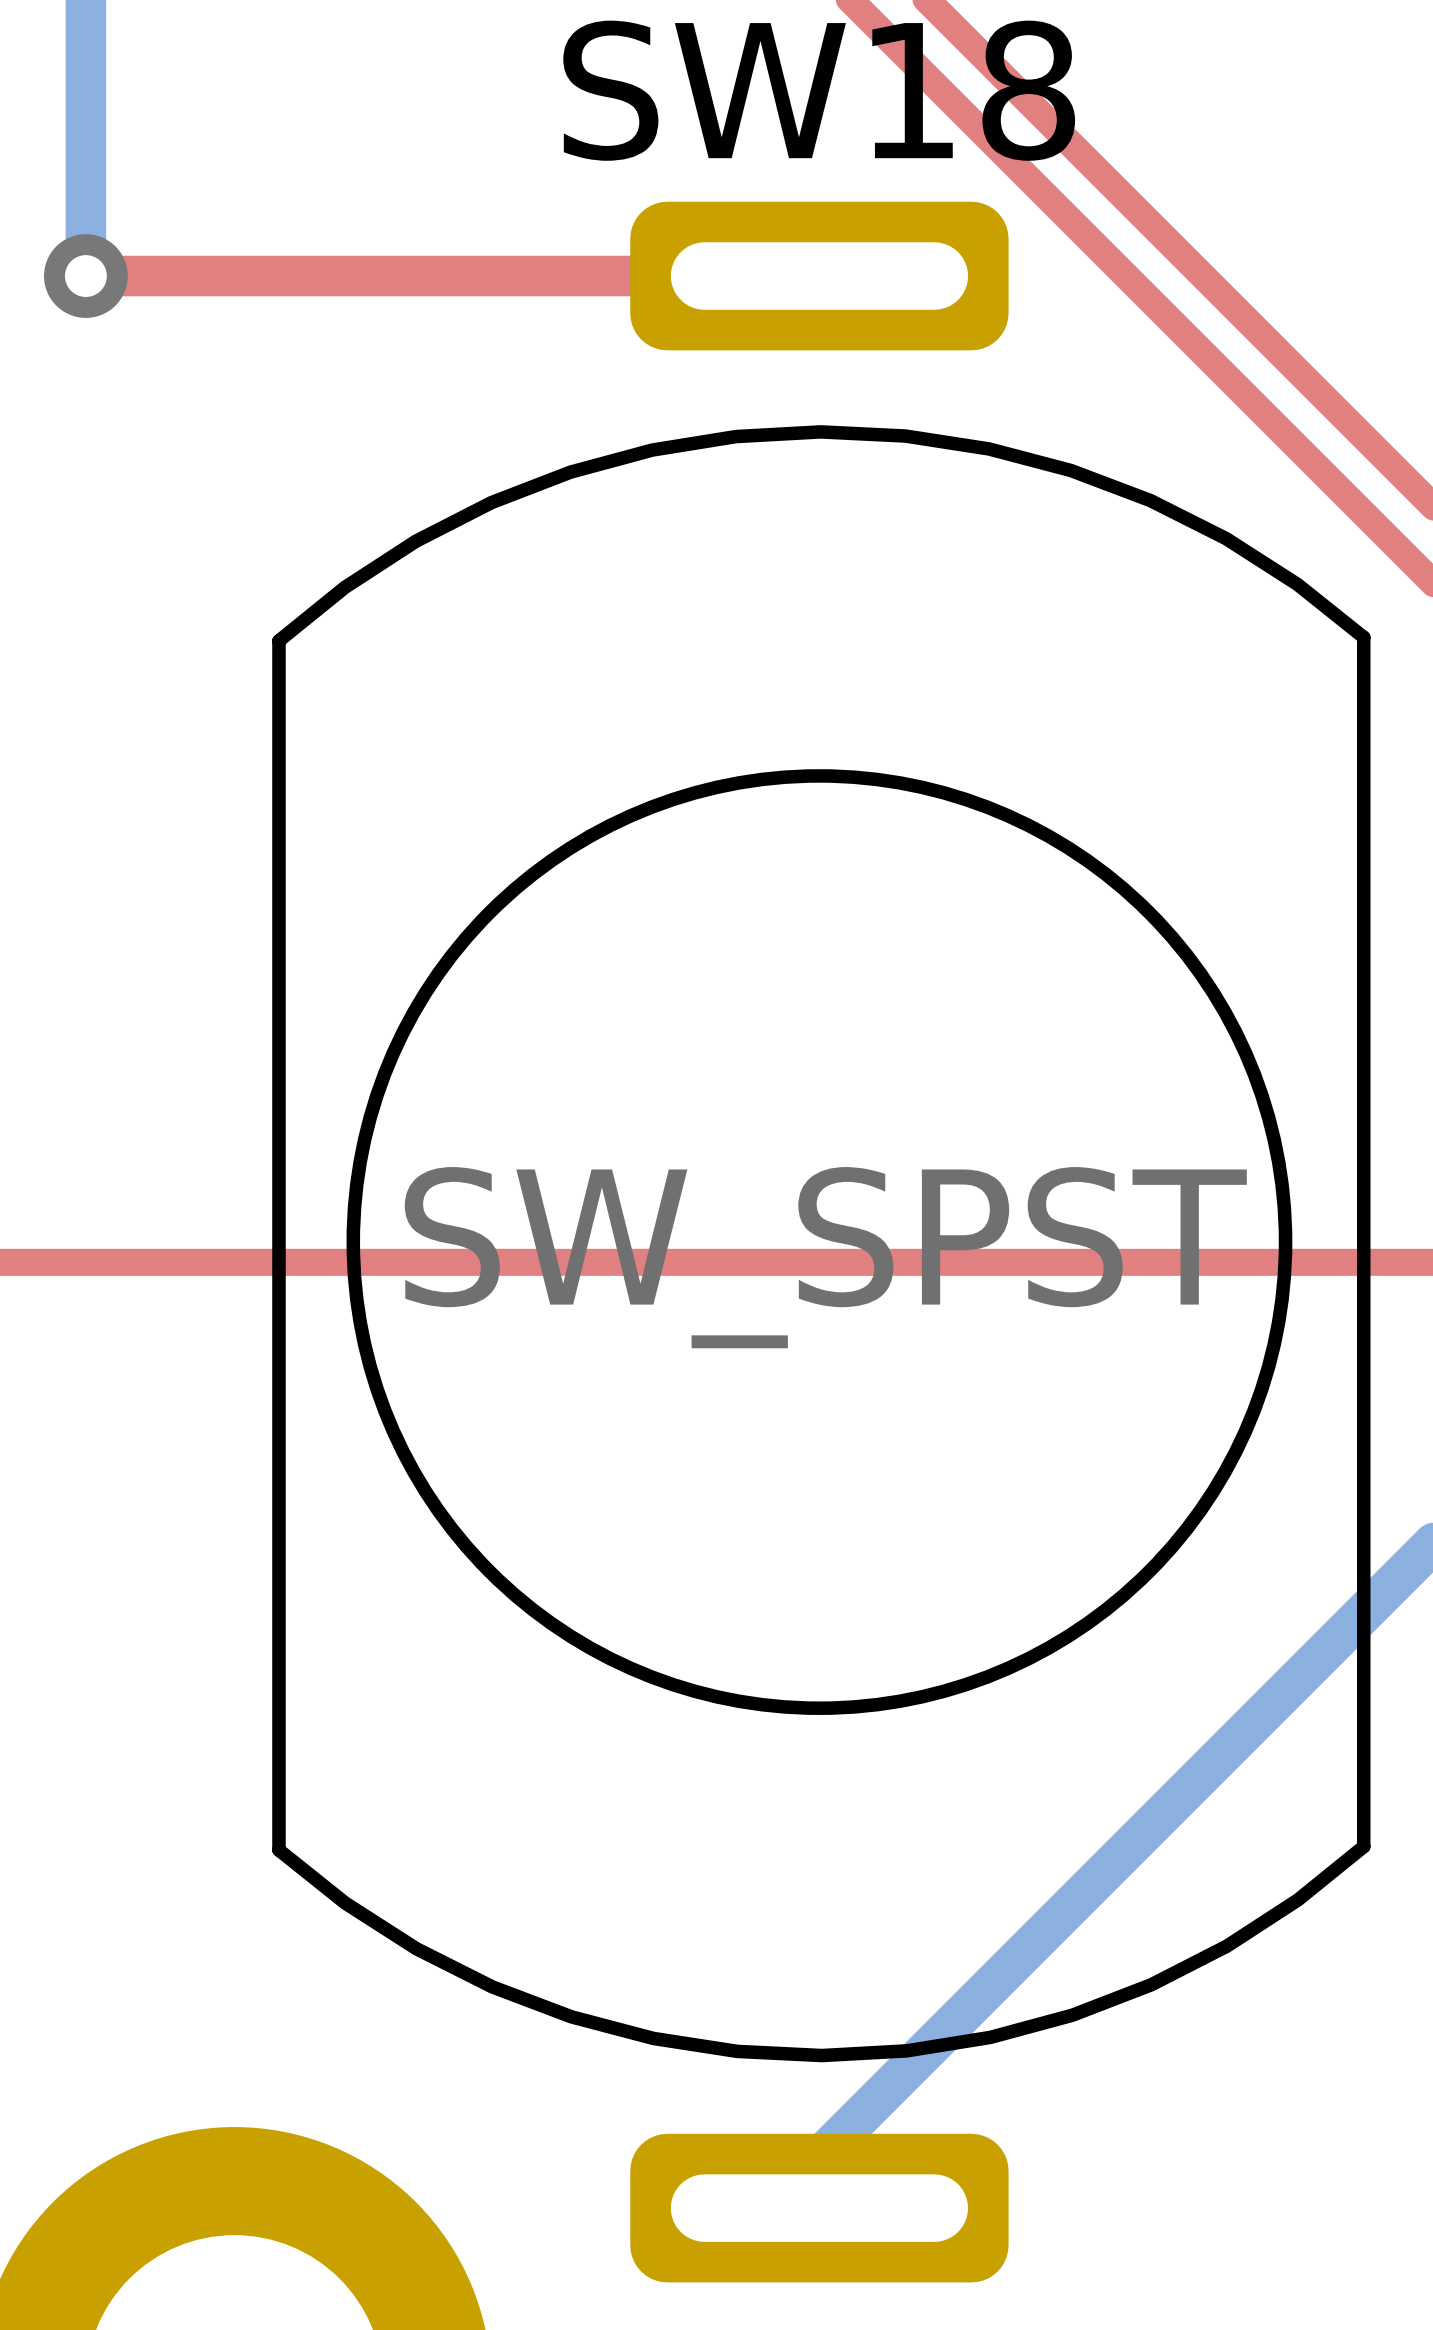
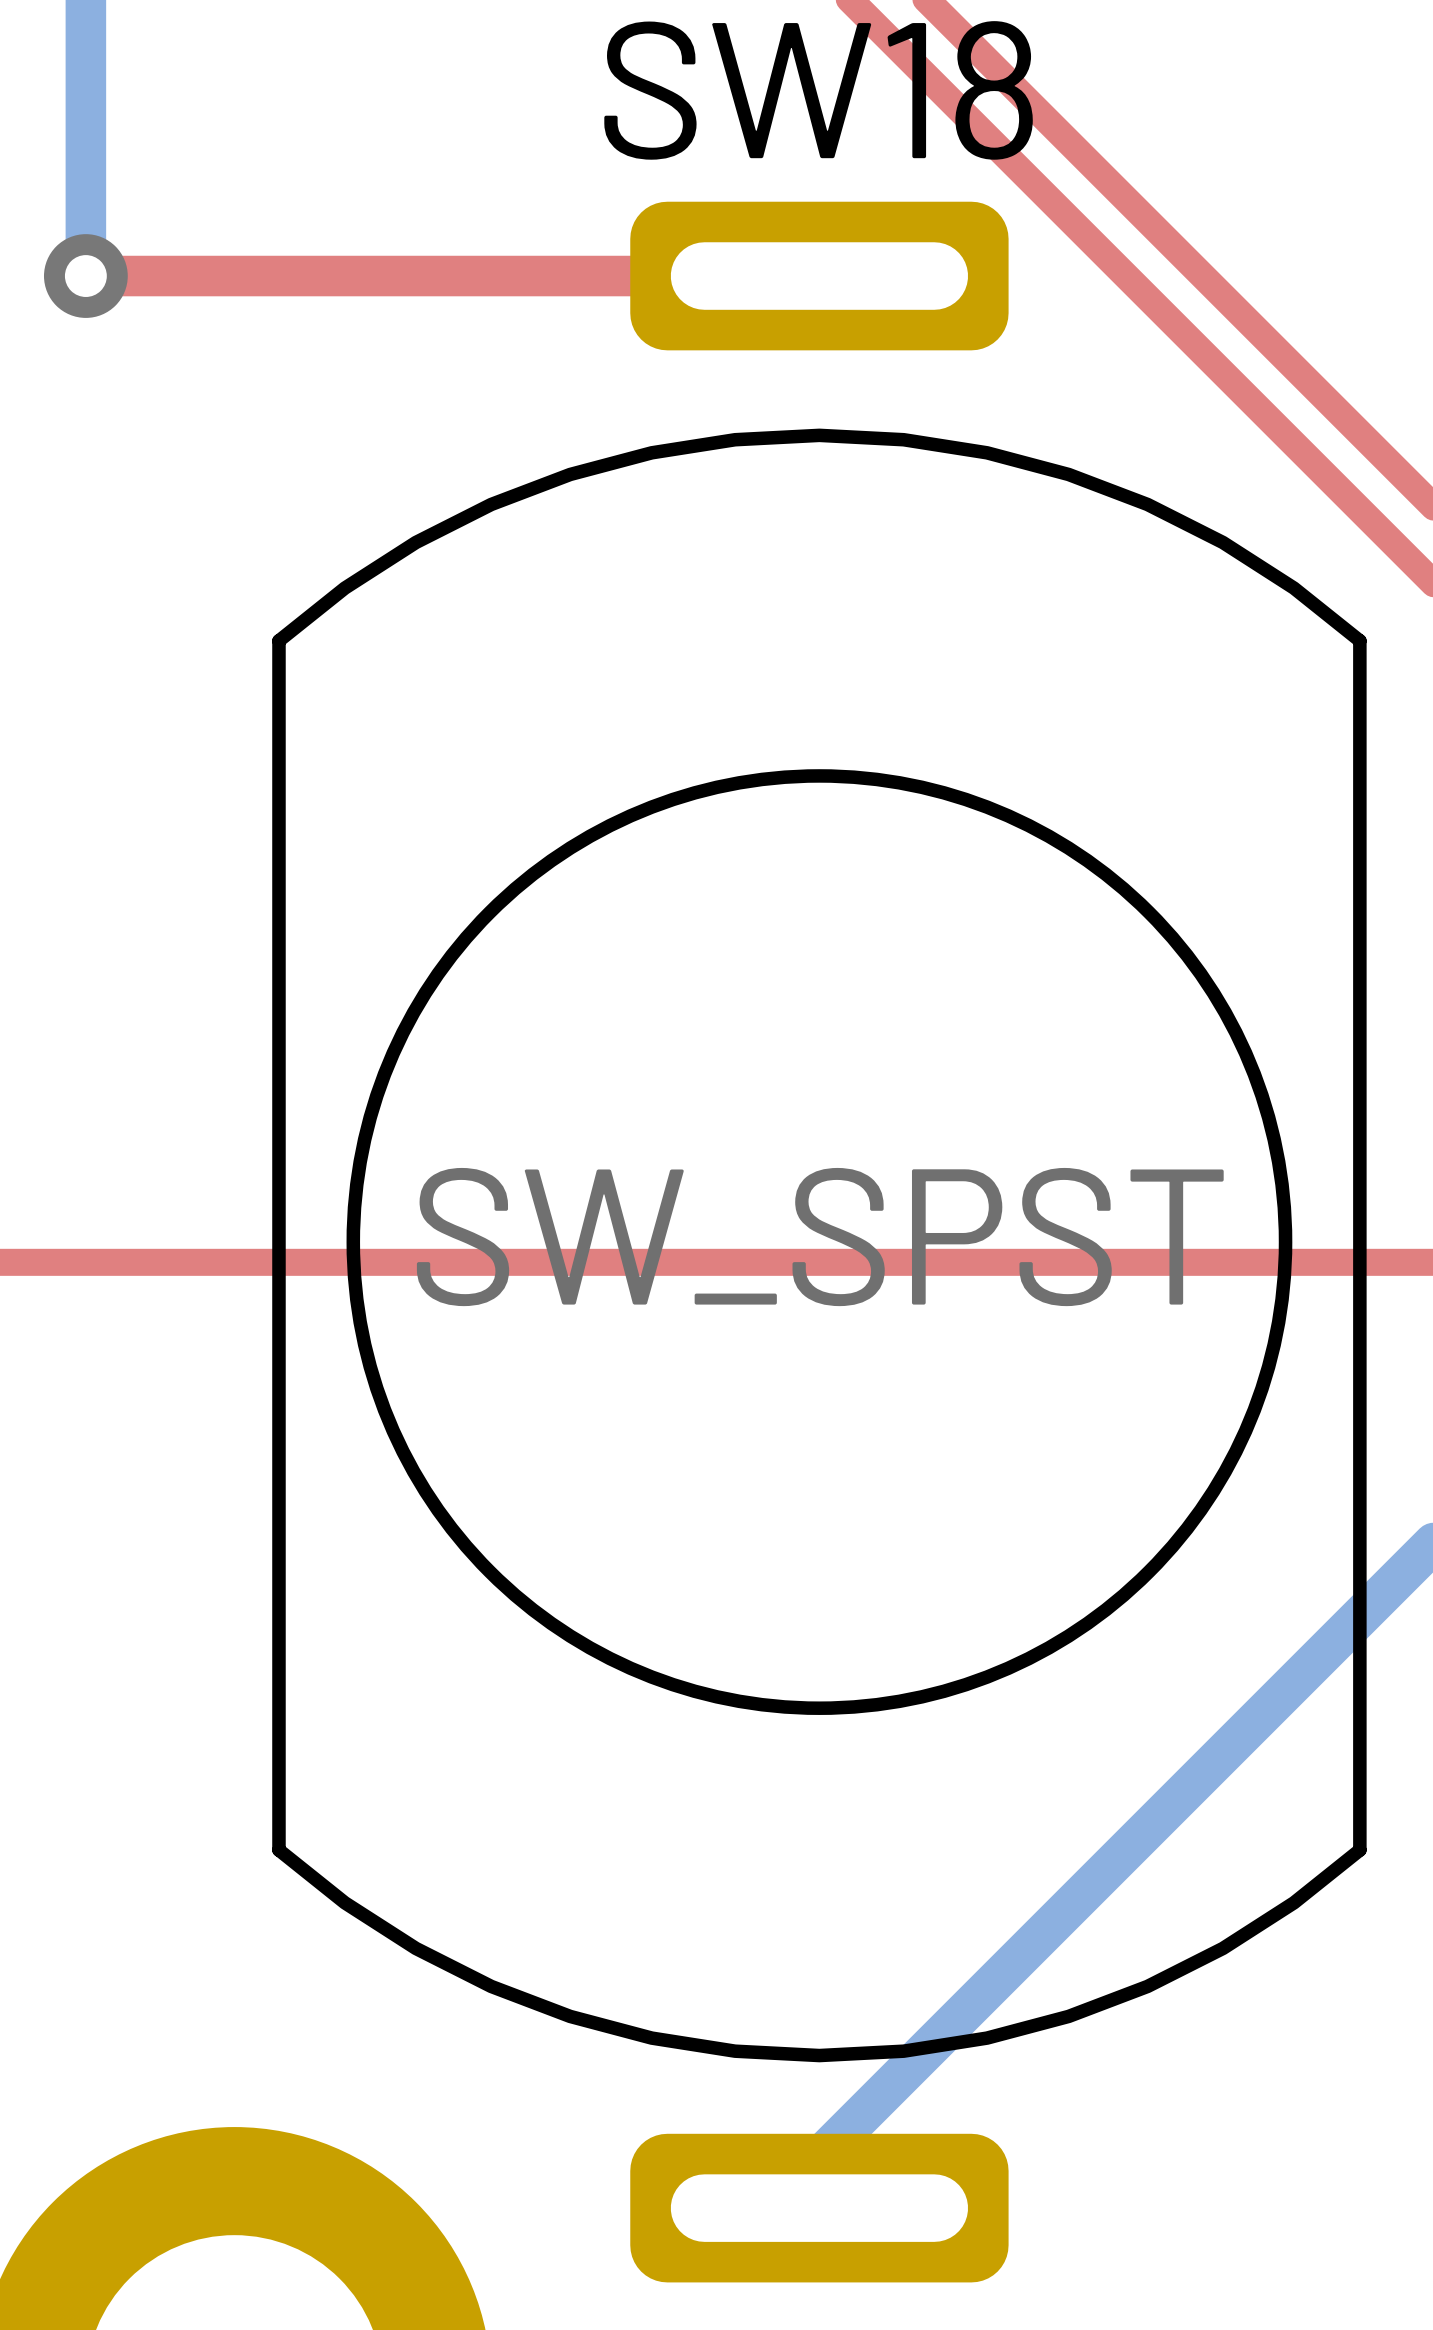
SW18 footprint: [272, 201, 1371, 2283] -> [272, 201, 1367, 2283]

